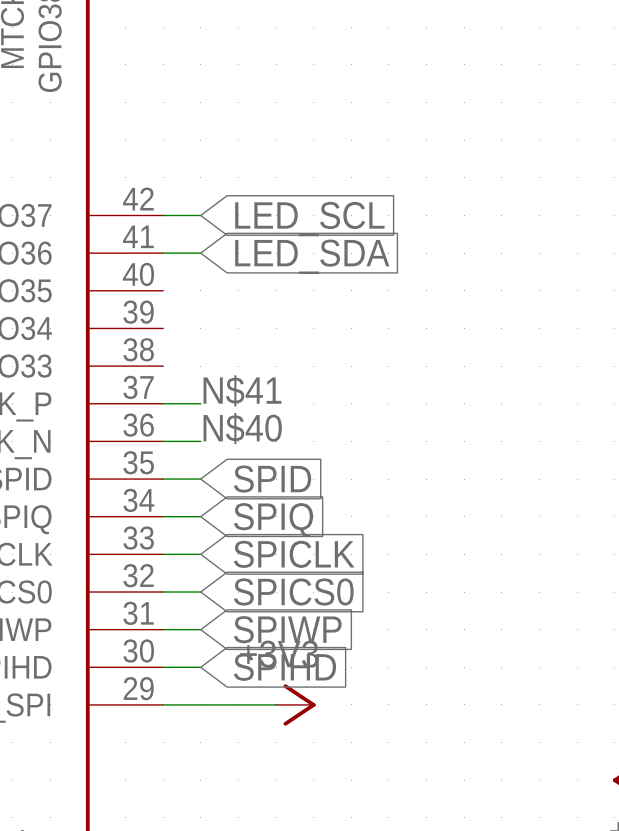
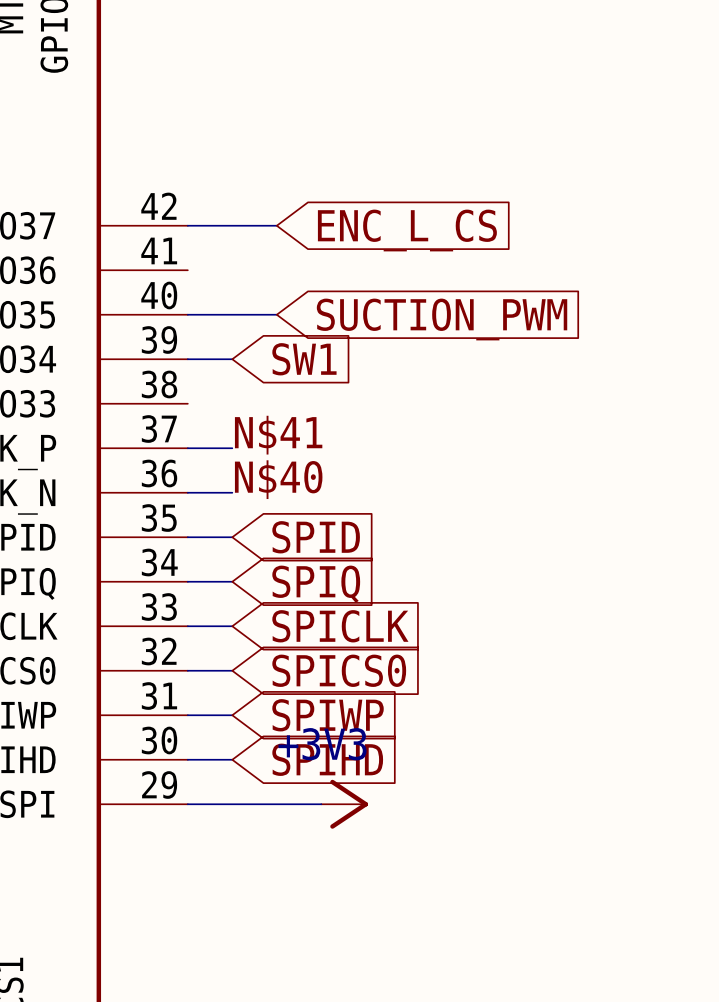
global label: LED_SCL (309, 219) -> none
global label: none -> ENC_L_CS (407, 230)
wire: (163, 253) (200, 253) -> (232, 225) (276, 225)
global label: LED_SDA (312, 256) -> none
wire: none -> (187, 314) (276, 314)
global label: none -> SUCTION_PWM (442, 319)
wire: none -> (187, 359) (232, 359)
global label: none -> SW1 (304, 359)

